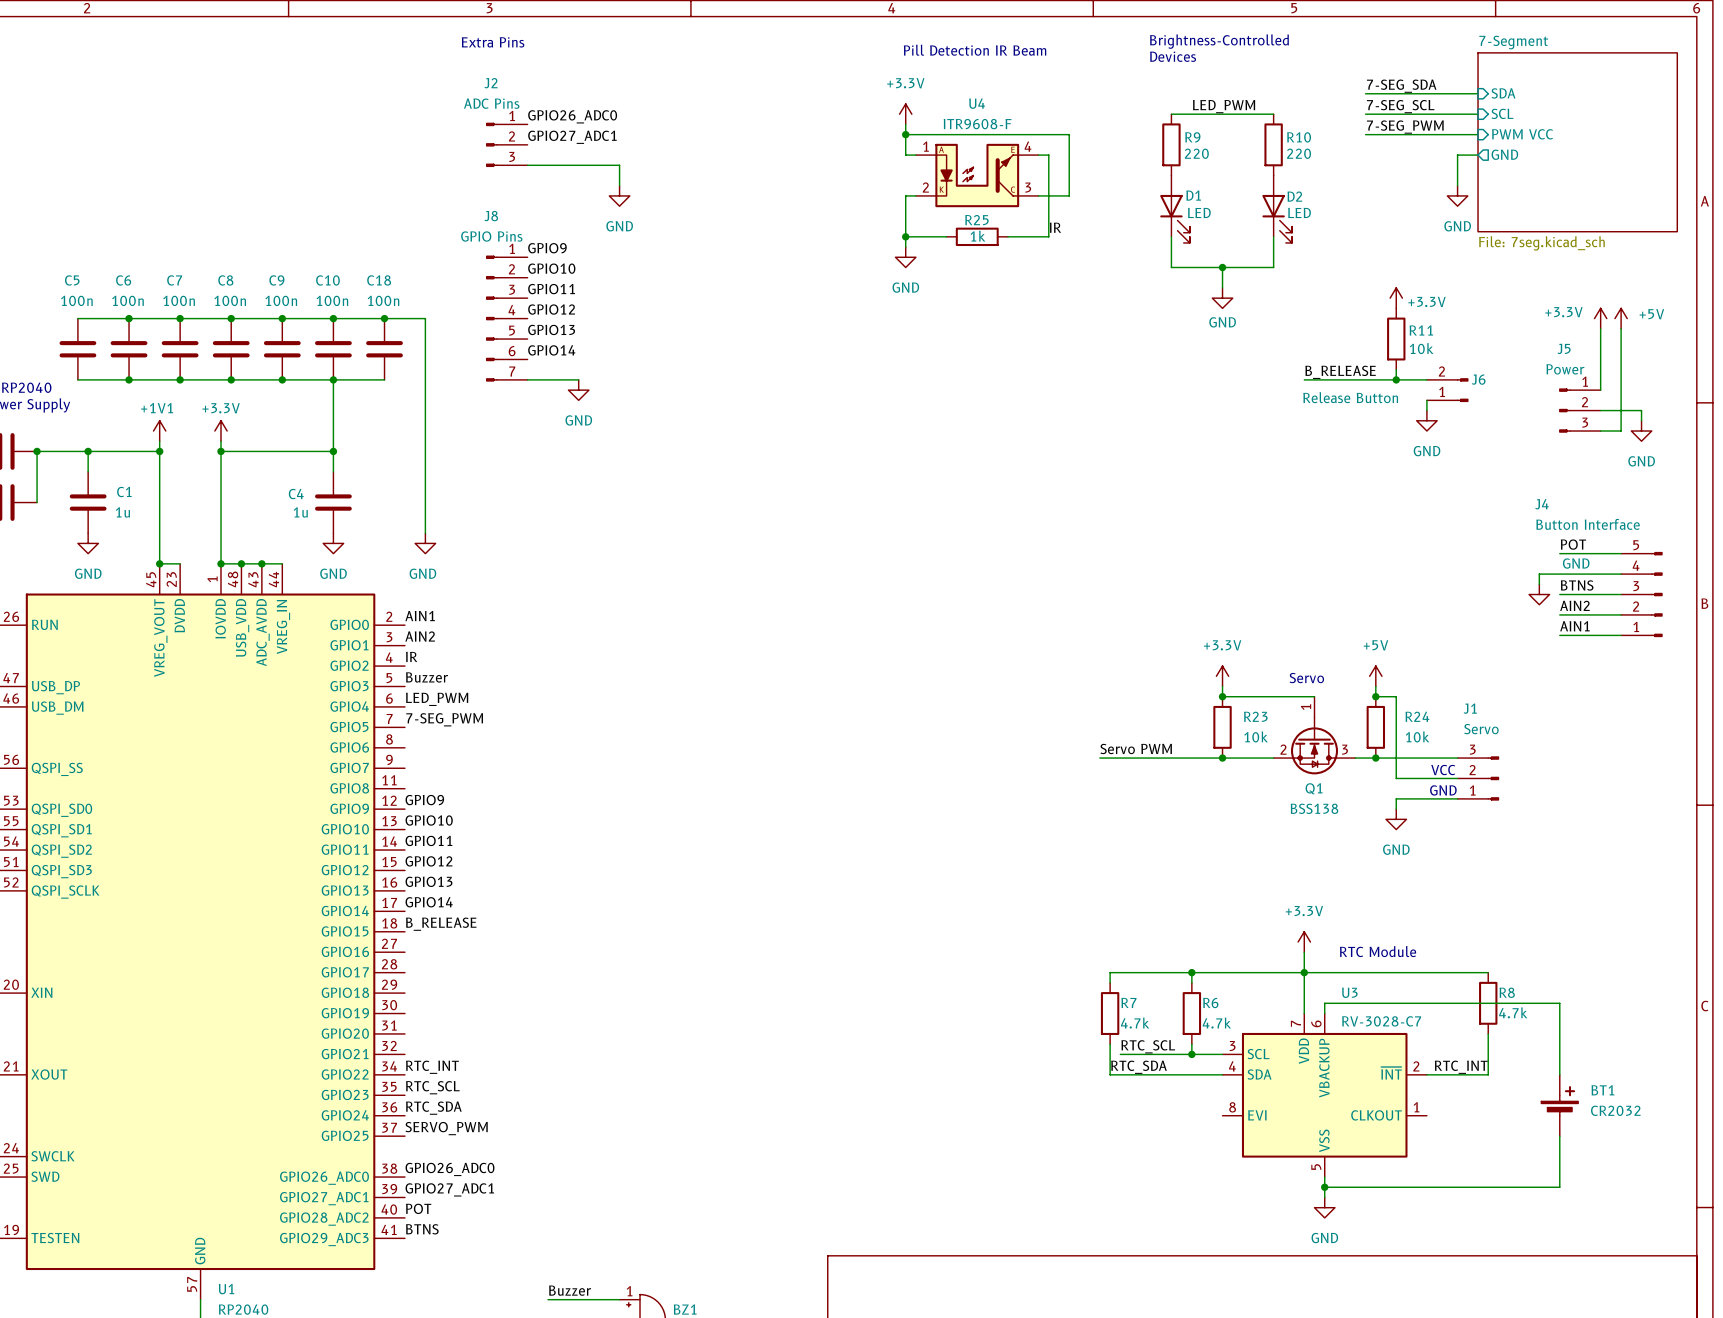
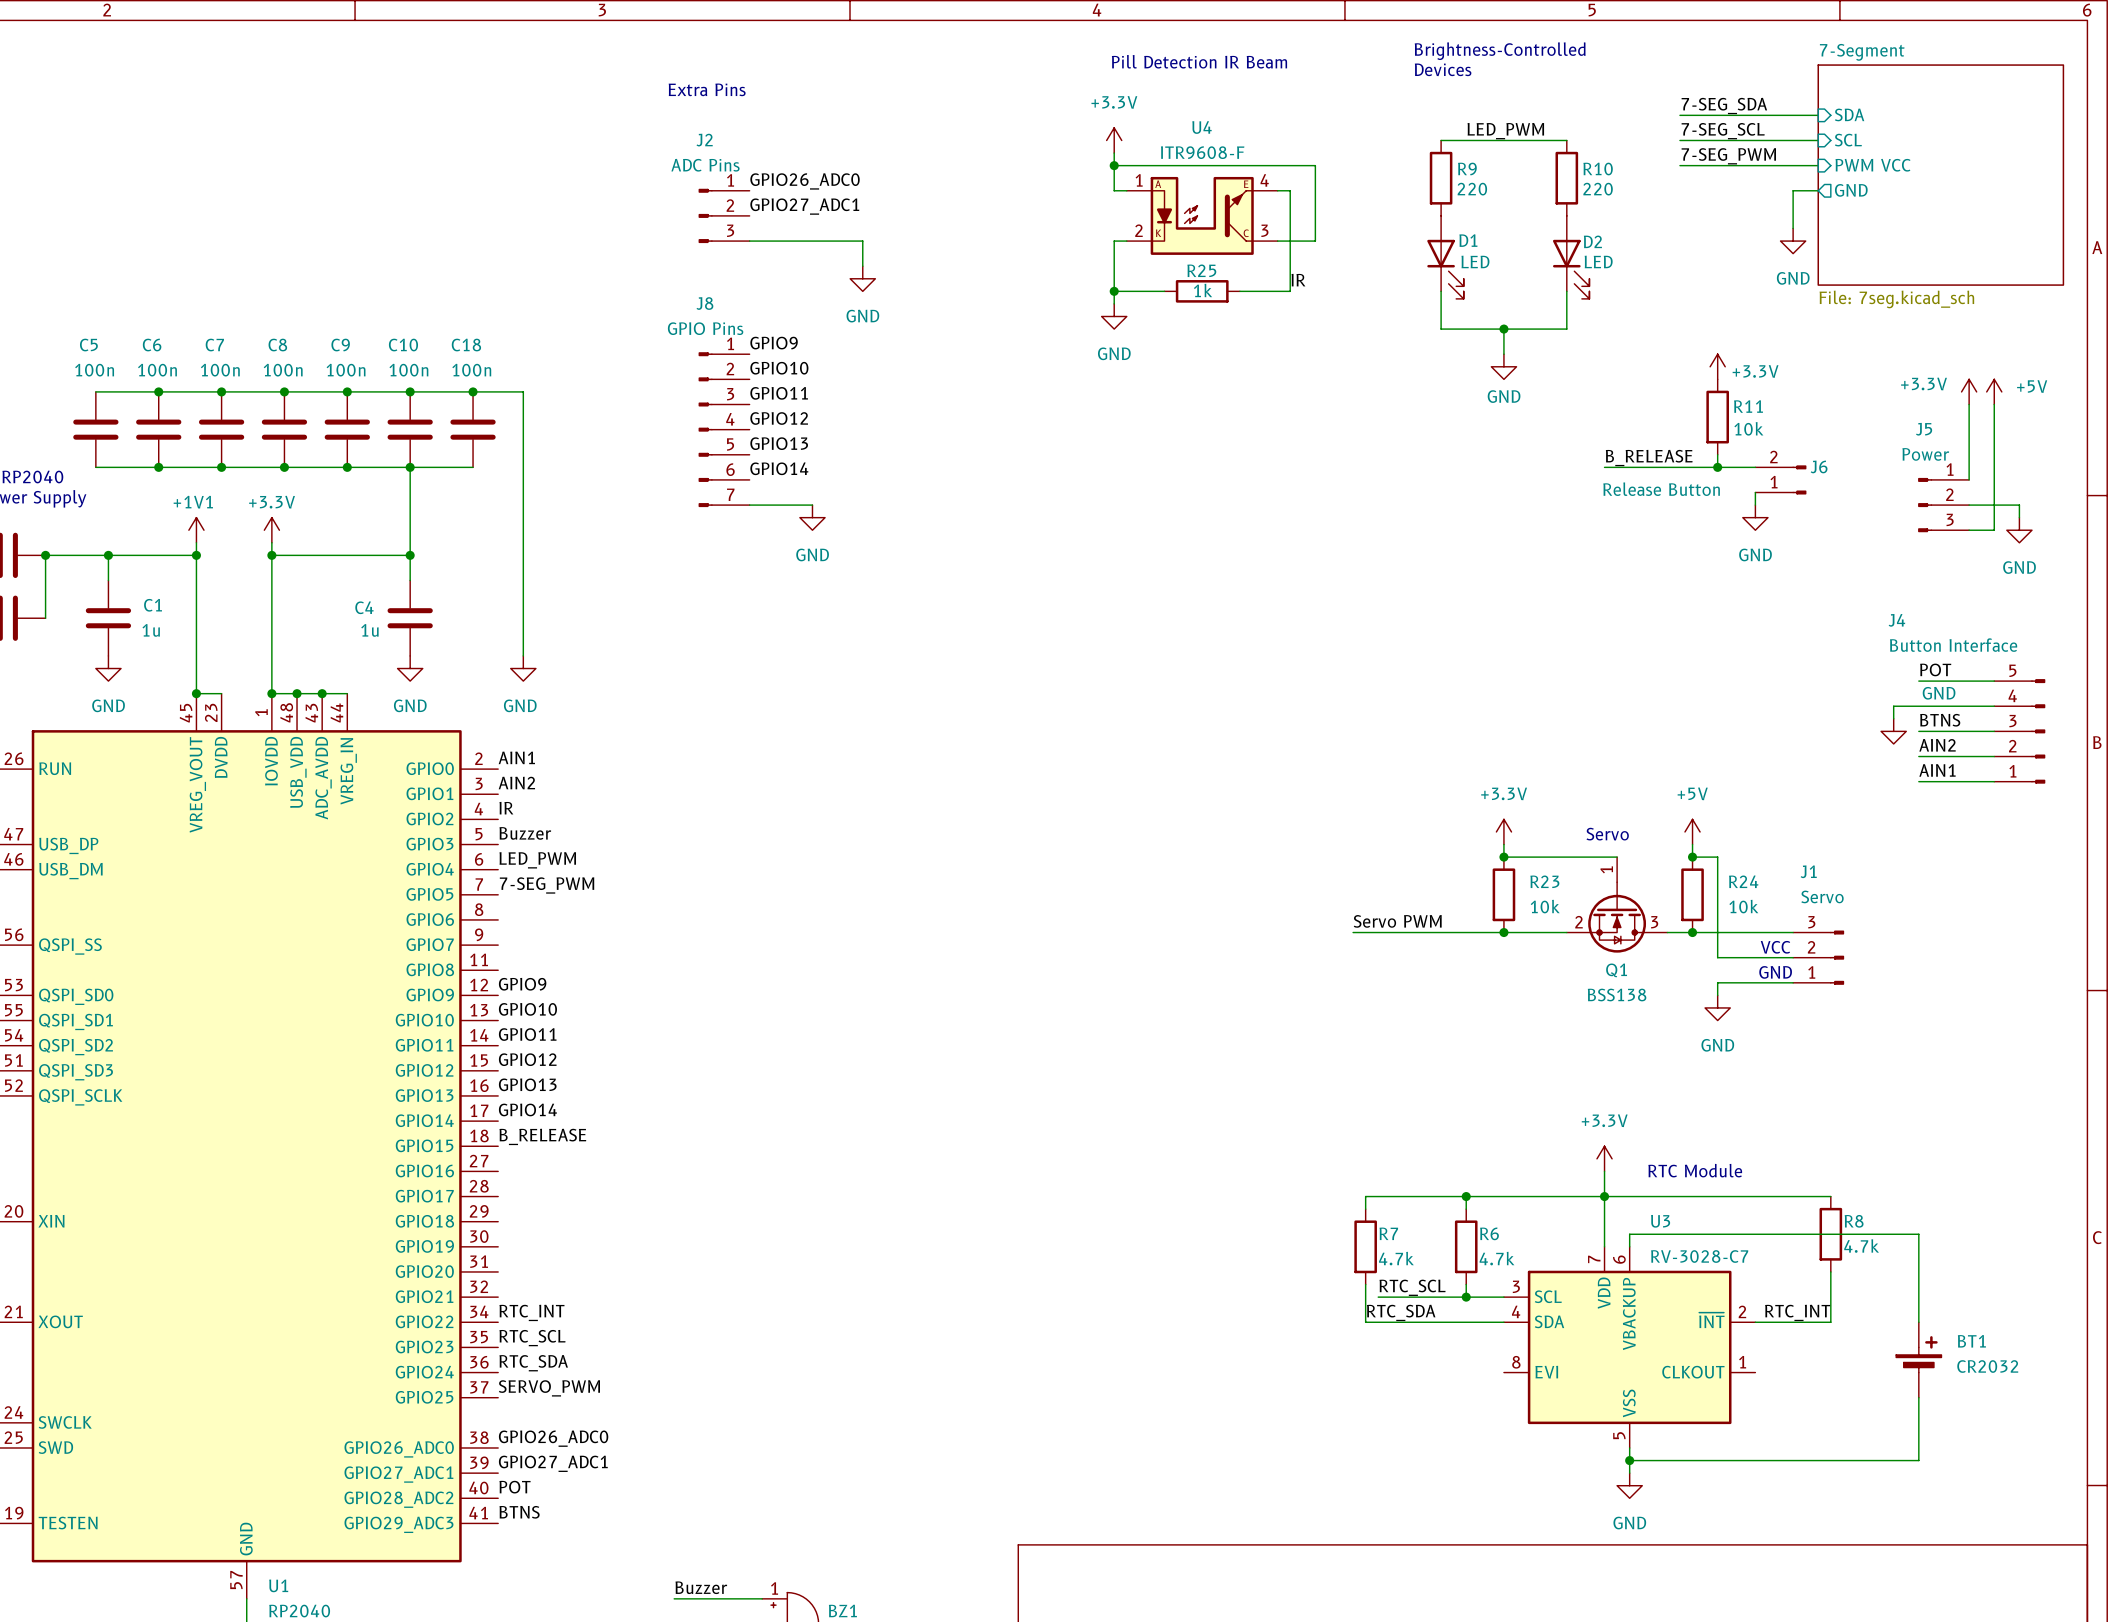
text position: Extra Pins (493, 42) -> Extra Pins (707, 89)
label position: GPIO26_ADC0 (572, 116) -> GPIO26_ADC0 (805, 181)
label position: GPIO27_ADC1 (572, 137) -> GPIO27_ADC1 (804, 206)
J2 position: (506, 144) -> (724, 215)
wire: (527, 165) (619, 165) (619, 185) -> (749, 241) (862, 241) (862, 266)
power symbol position: GND (619, 195) -> GND (862, 278)
label position: GPIO9 (547, 248) -> GPIO9 (774, 343)
label position: GPIO10 (551, 268) -> GPIO10 (779, 368)
label position: GPIO11 (551, 289) -> GPIO11 (779, 393)
label position: GPIO12 (551, 309) -> GPIO12 (779, 418)
J8 position: (506, 318) -> (724, 429)
label position: GPIO13 (551, 329) -> GPIO13 (779, 443)
label position: GPIO14 (551, 350) -> GPIO14 (779, 468)
wire: (527, 379) (578, 379) -> (749, 505) (812, 505)
power symbol position: GND (578, 390) -> GND (812, 517)

